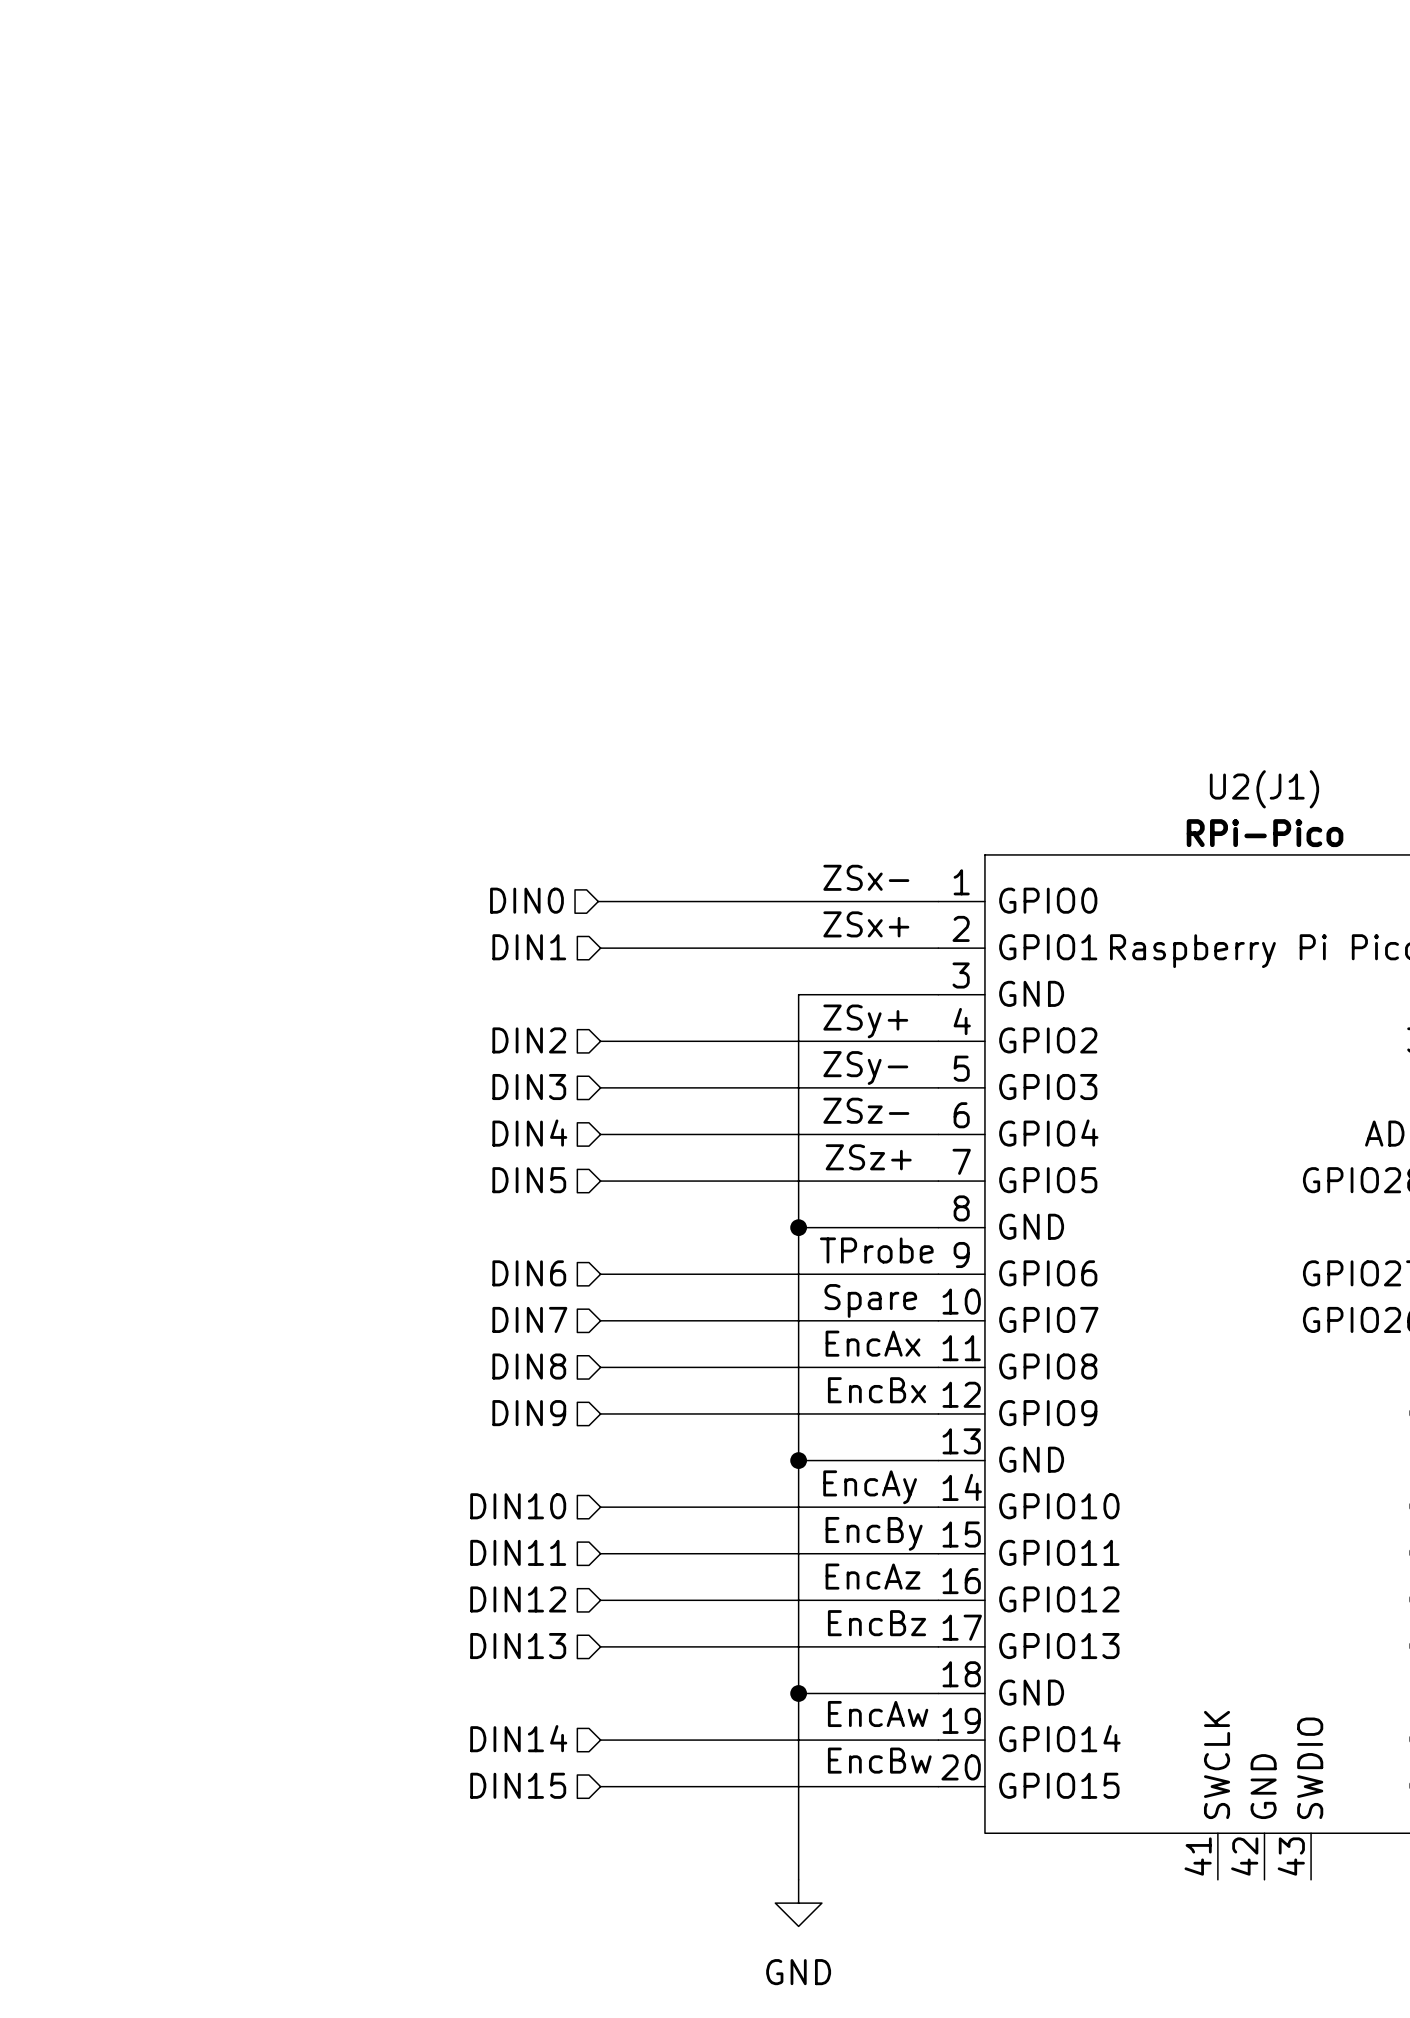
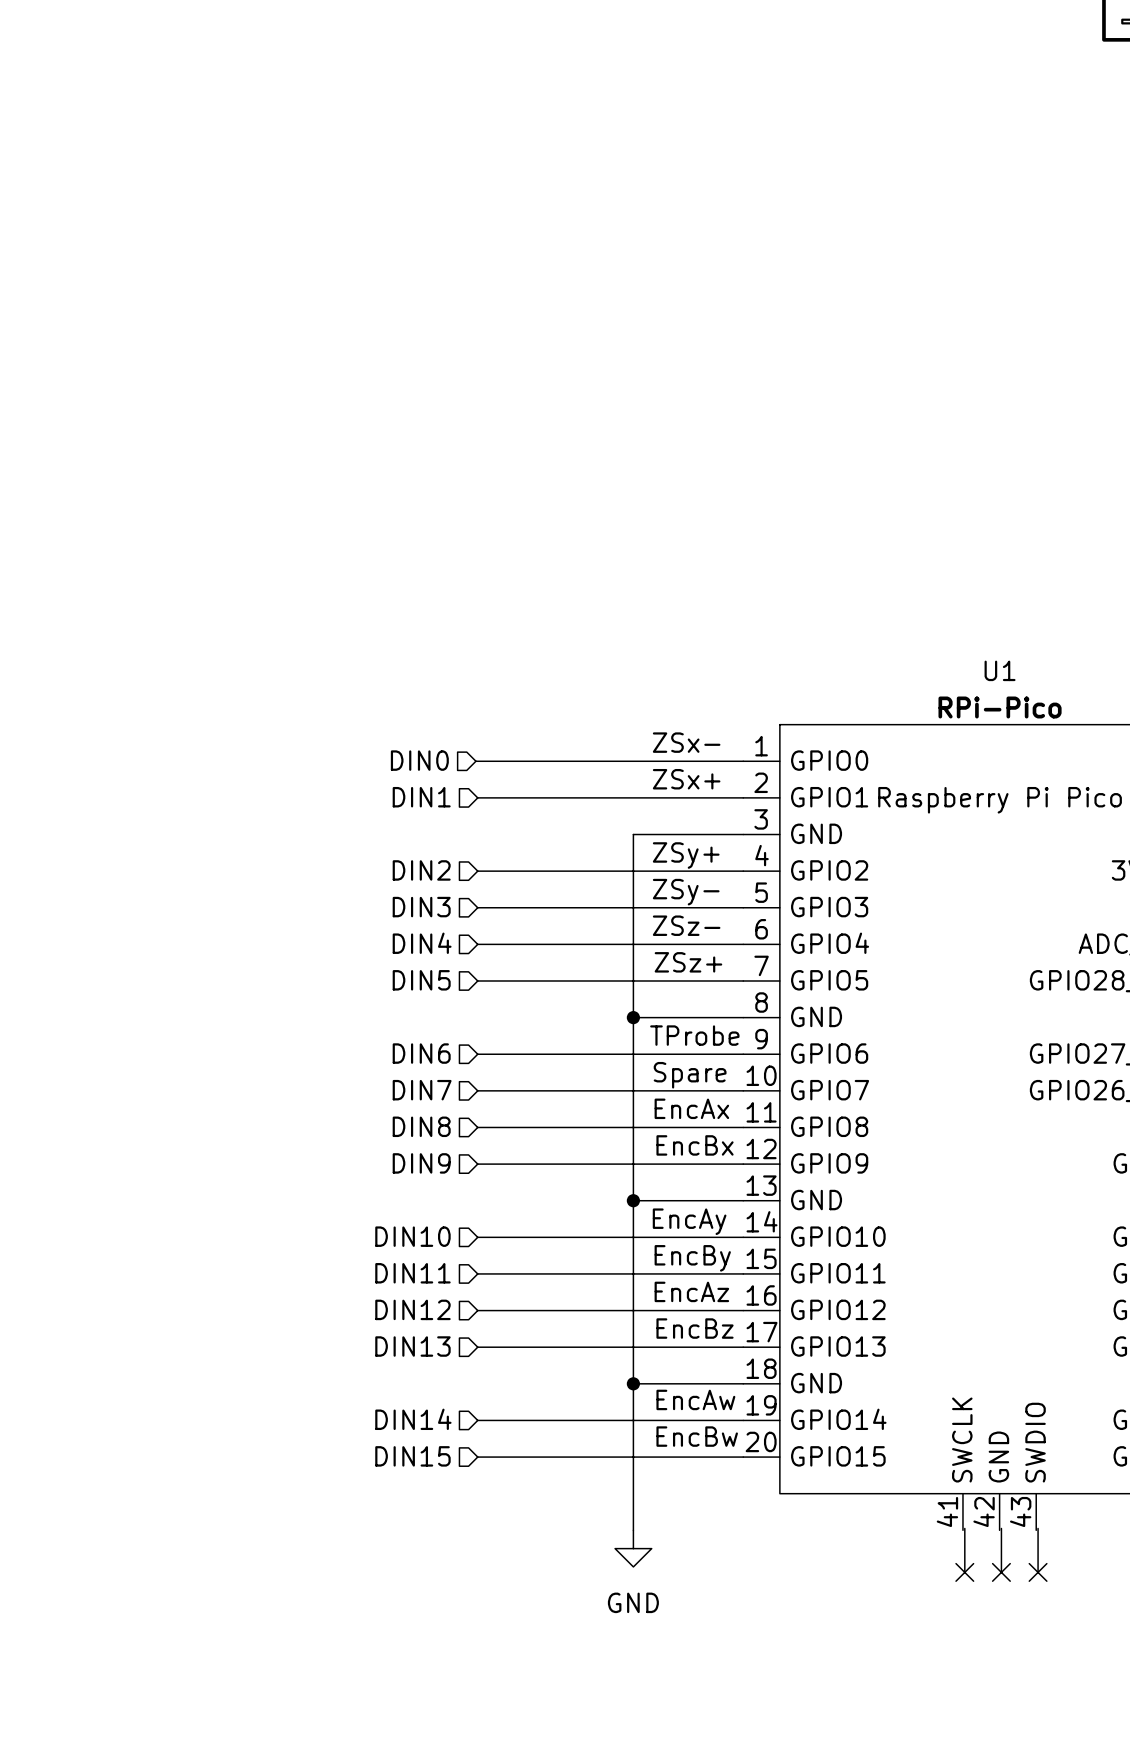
U2(J1) name: U2(J1) (1264, 789) -> U1 (1000, 670)
wire: none -> (964, 1528) (964, 1572)
wire: none -> (1001, 1528) (1001, 1572)
wire: none -> (1038, 1528) (1038, 1572)
no-connect mark: none -> (964, 1572)
no-connect mark: none -> (1001, 1572)
no-connect mark: none -> (1038, 1572)

